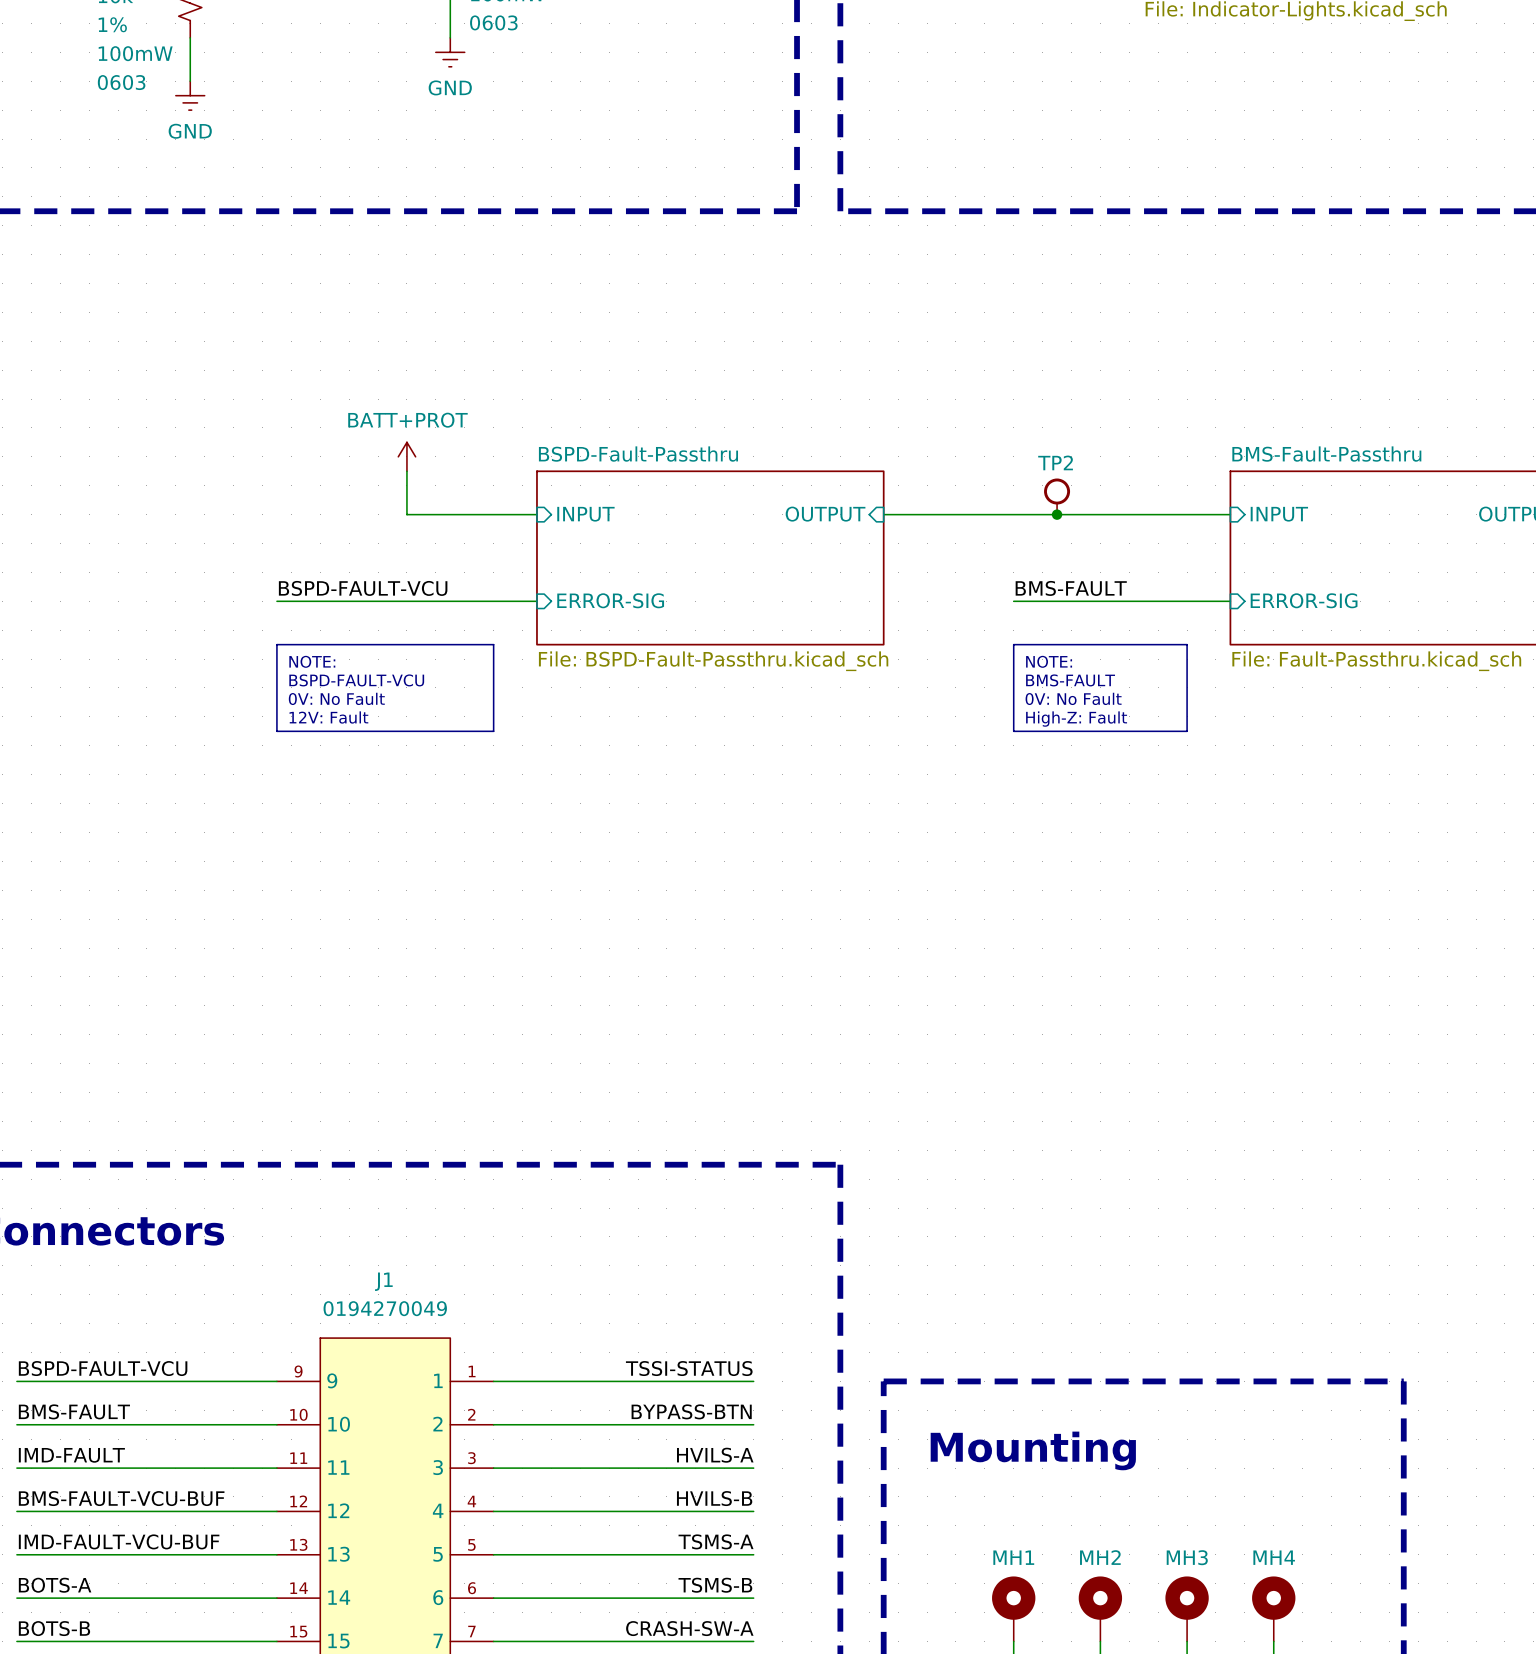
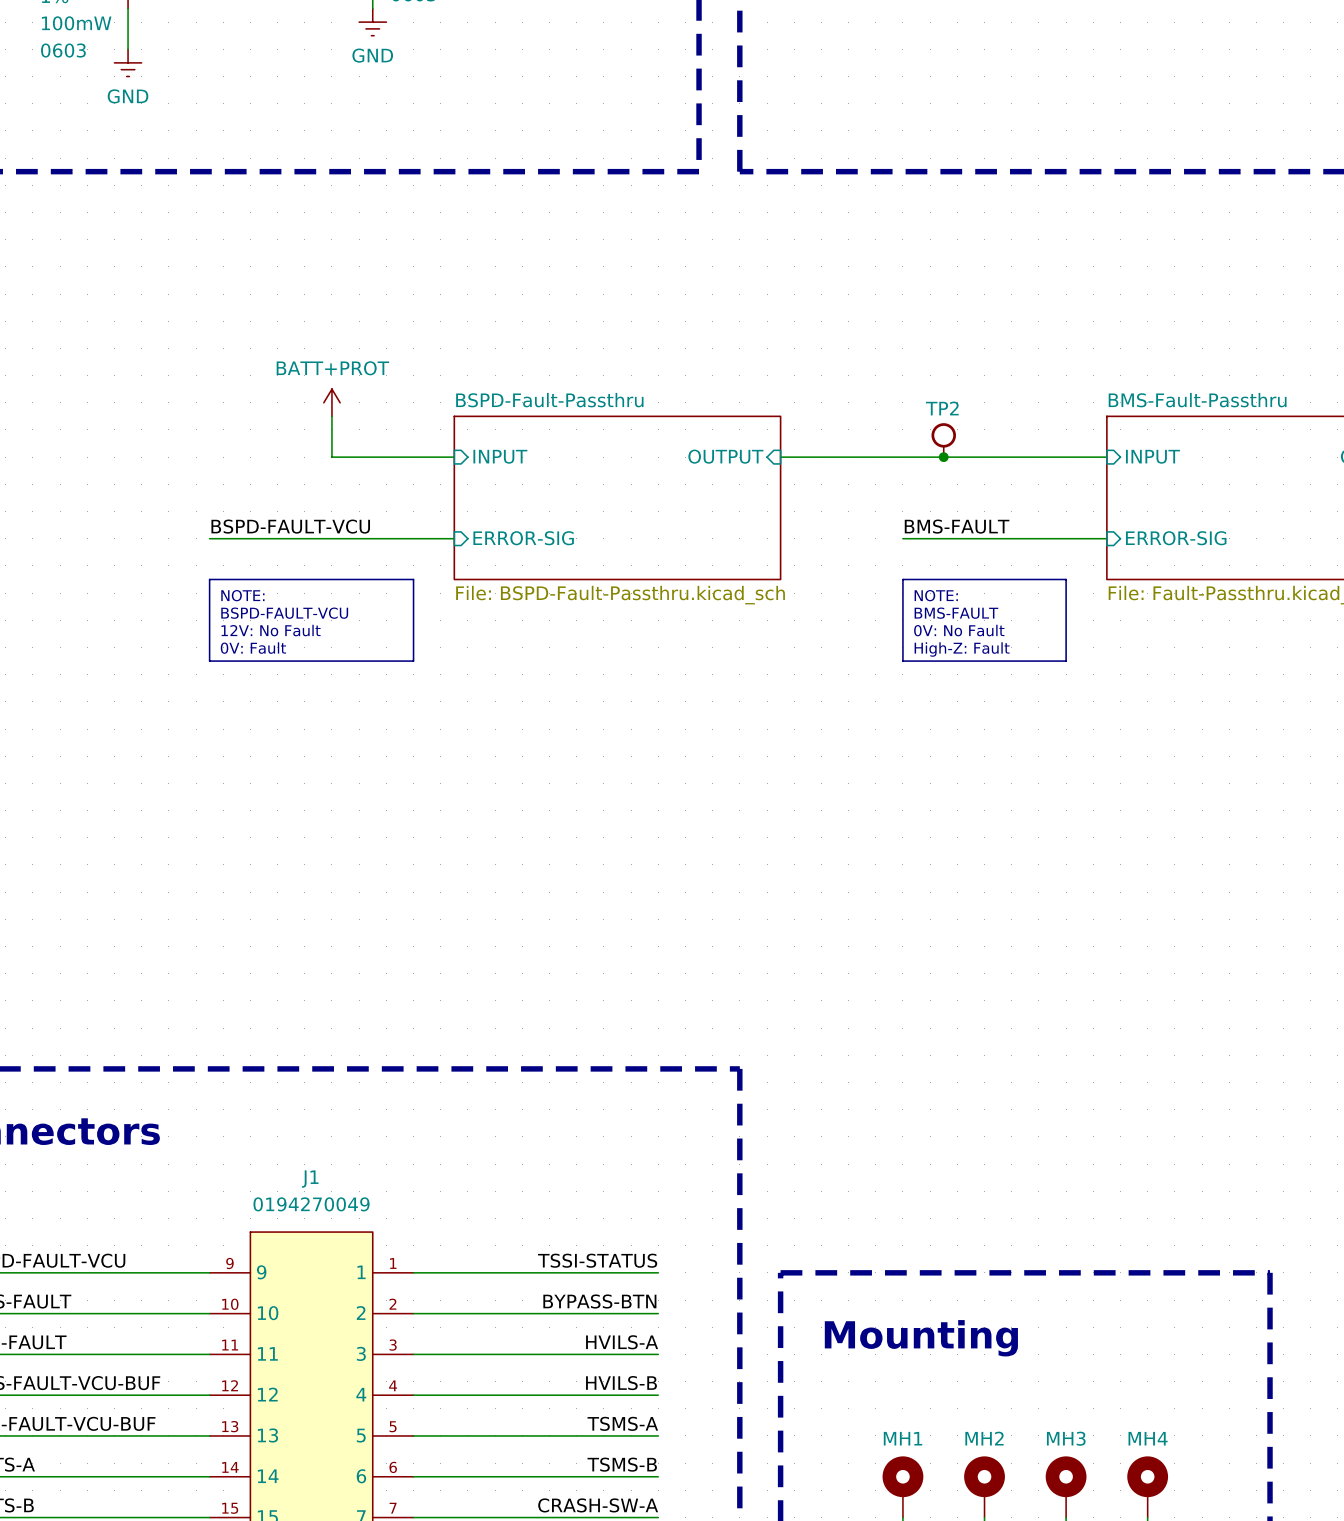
text: 0V: No Fault (336, 698) -> 12V: No Fault (271, 630)
text: 12V: Fault (328, 717) -> 0V: Fault (253, 648)

